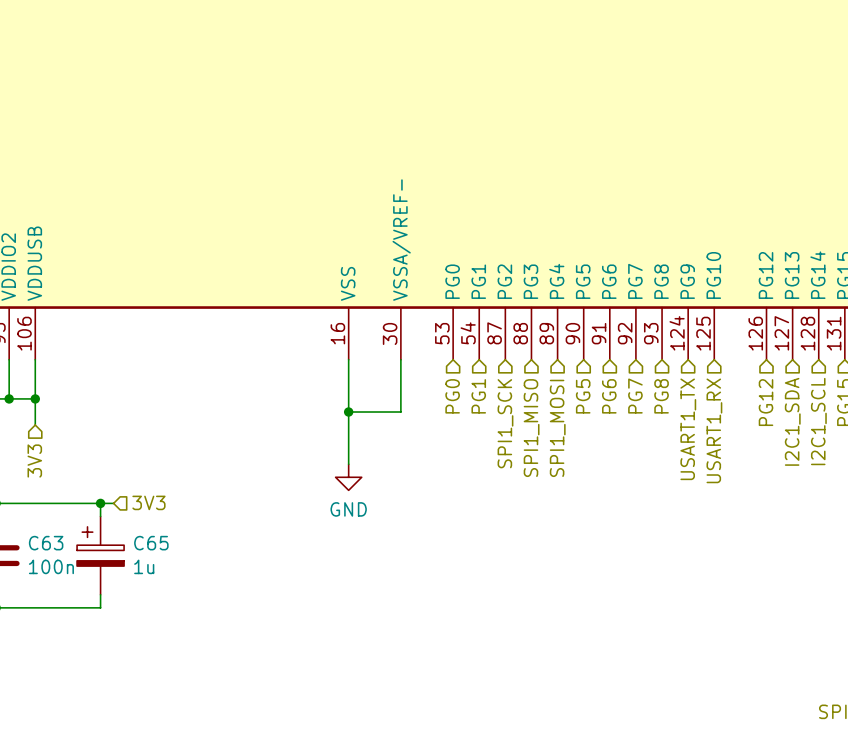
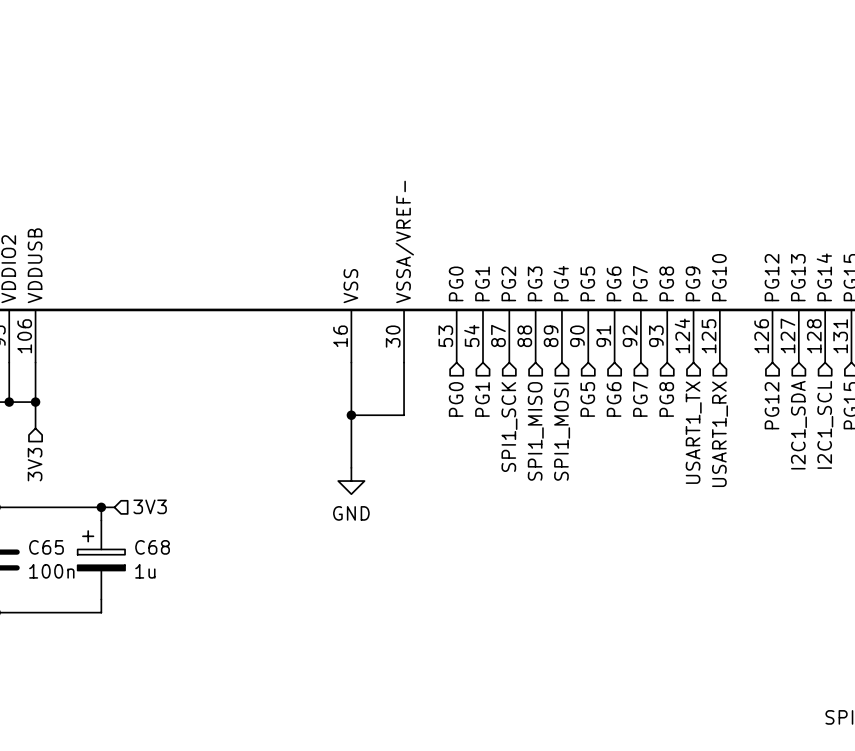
C63 name: C63 (46, 543) -> C65 (46, 547)
C65 name: C65 (151, 543) -> C68 (152, 547)

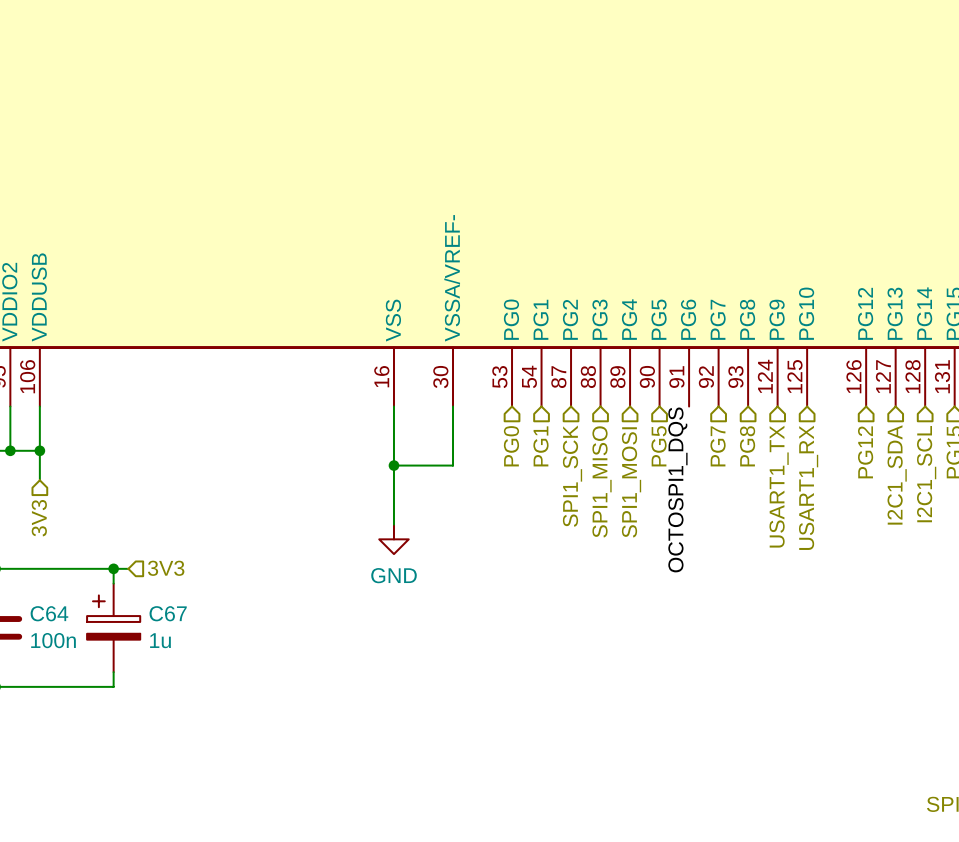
hierarchical label: PG6 (614, 399) -> none
label: none -> OCTOSPI1_DQS (677, 489)
C65 name: C65 (46, 547) -> C64 (49, 613)
C68 name: C68 (152, 547) -> C67 (168, 613)

